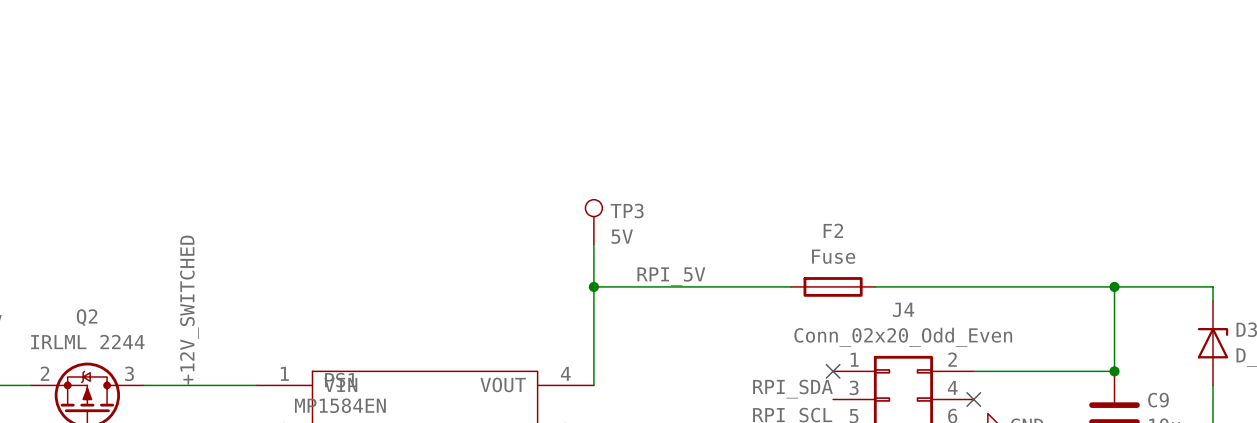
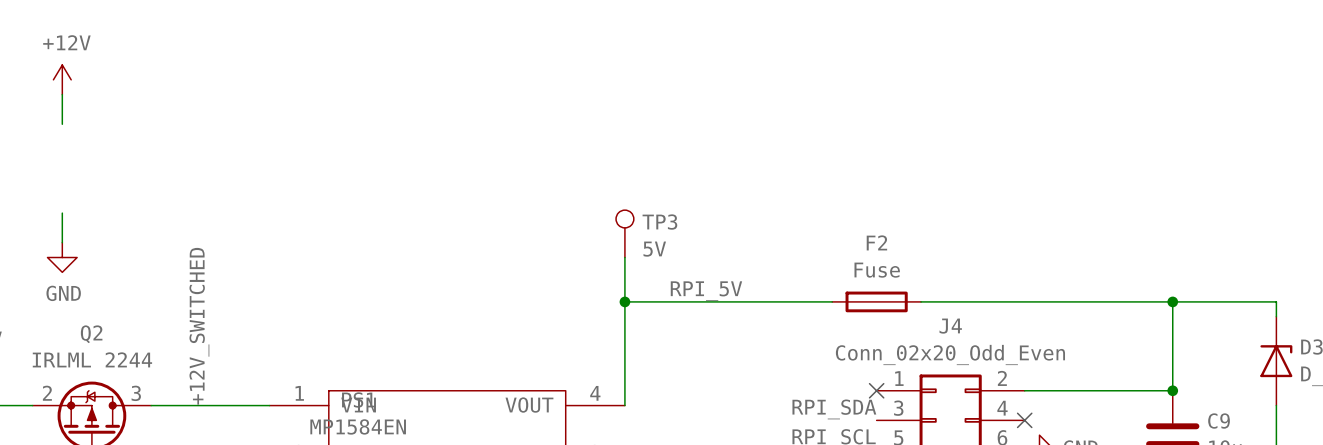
power symbol: none -> +12V (62, 79)
wire: none -> (62, 94) (62, 124)
wire: none -> (62, 213) (62, 242)
power symbol: none -> GND (62, 257)

